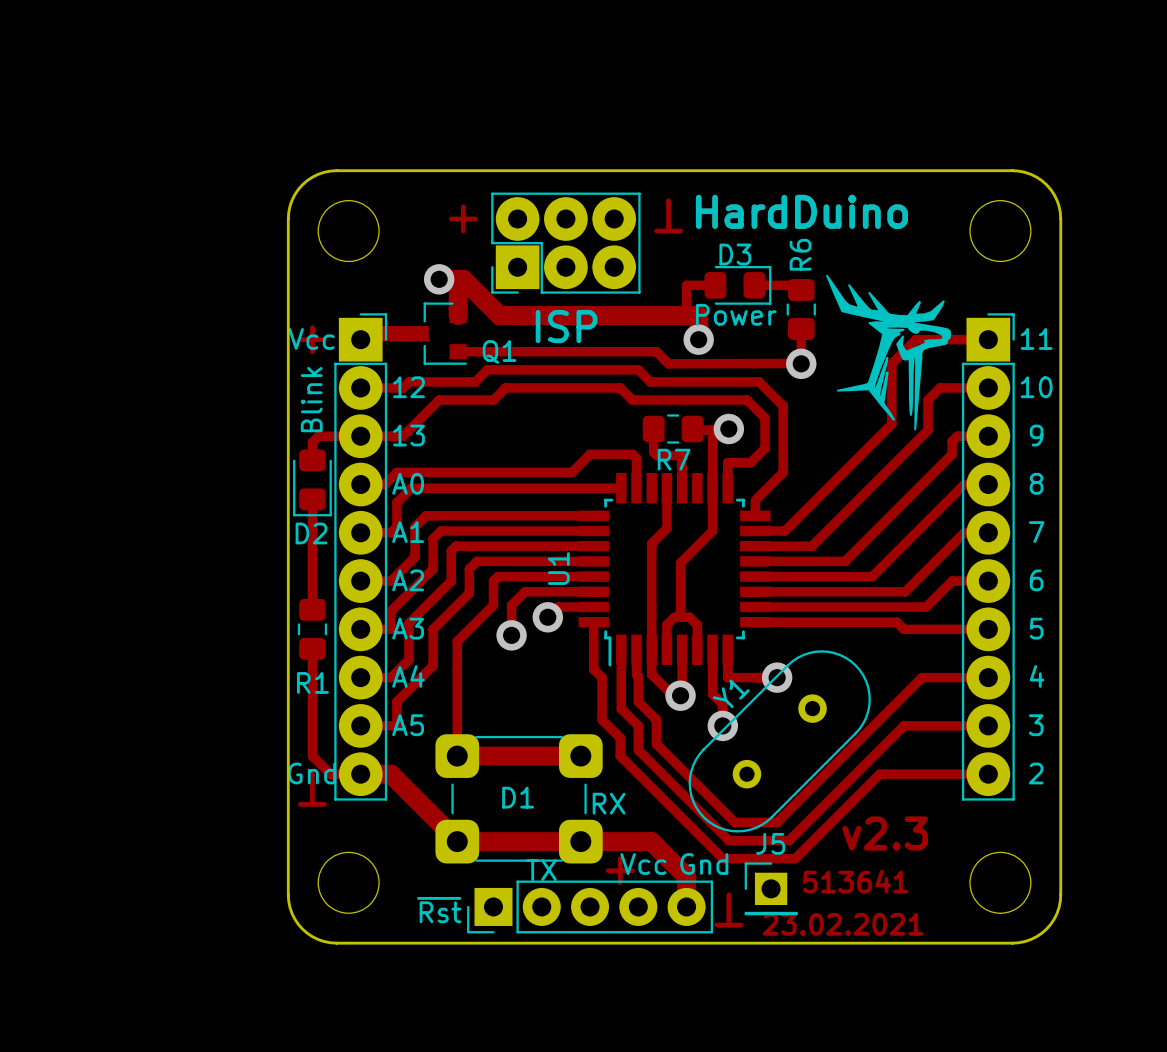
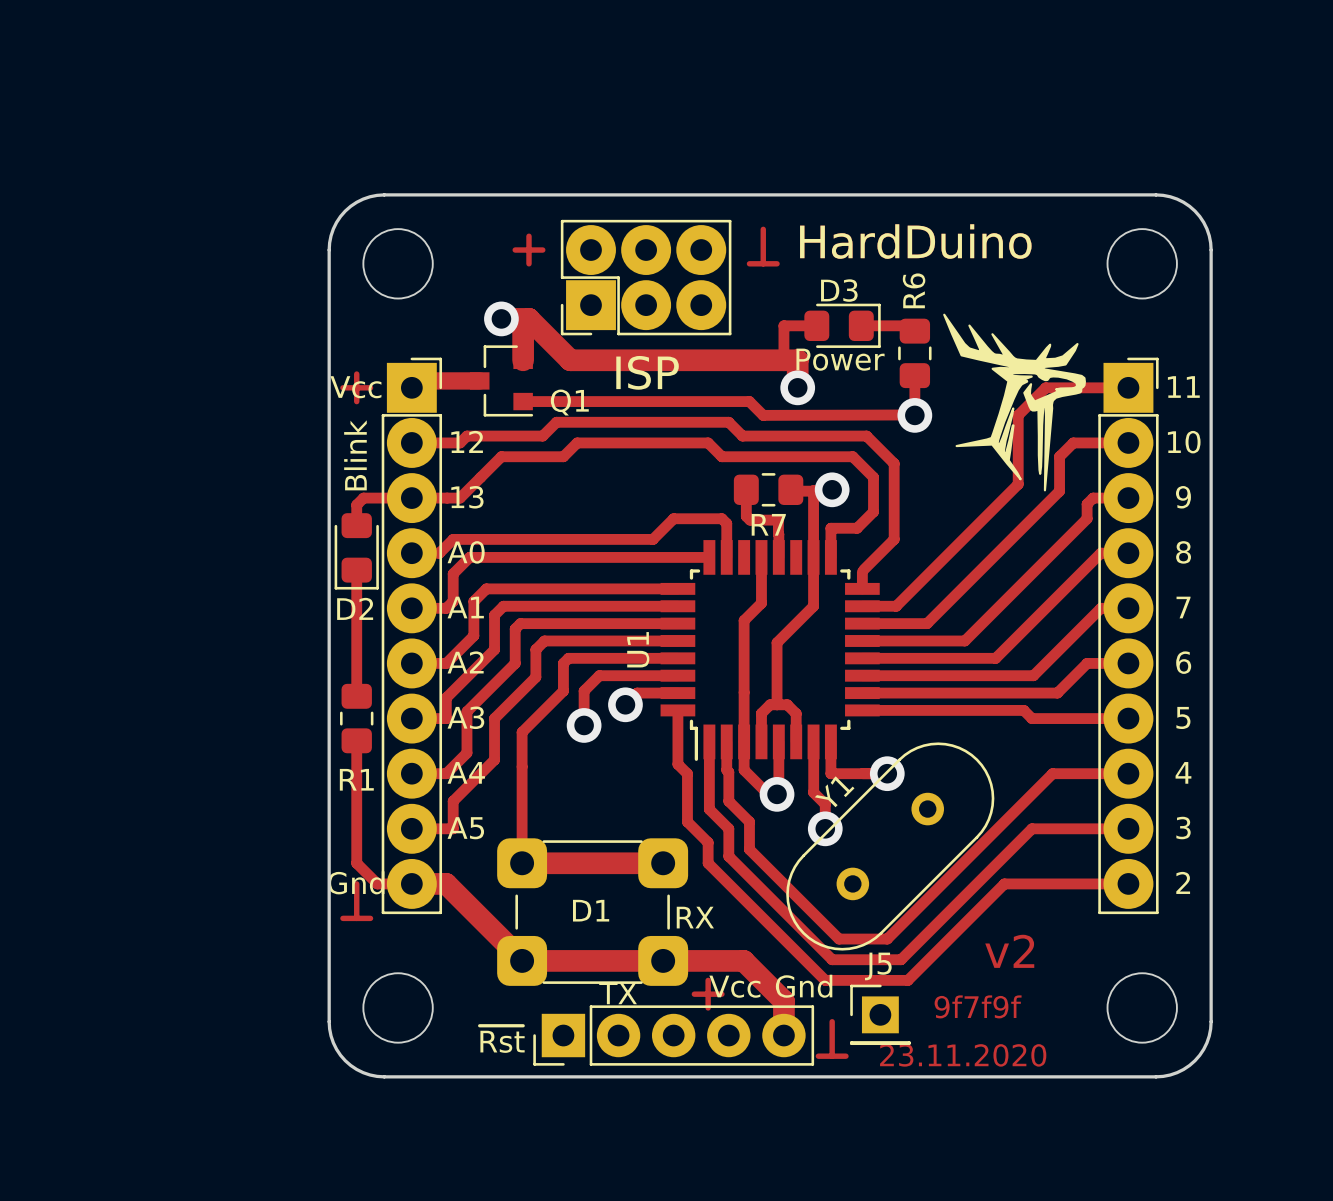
text: v2.3 (885, 833) -> v2 (1009, 951)
text: 513641 (855, 881) -> 9f7f9f (978, 1006)
text: 23.02.2021 (843, 924) -> 23.11.2020 (963, 1055)

